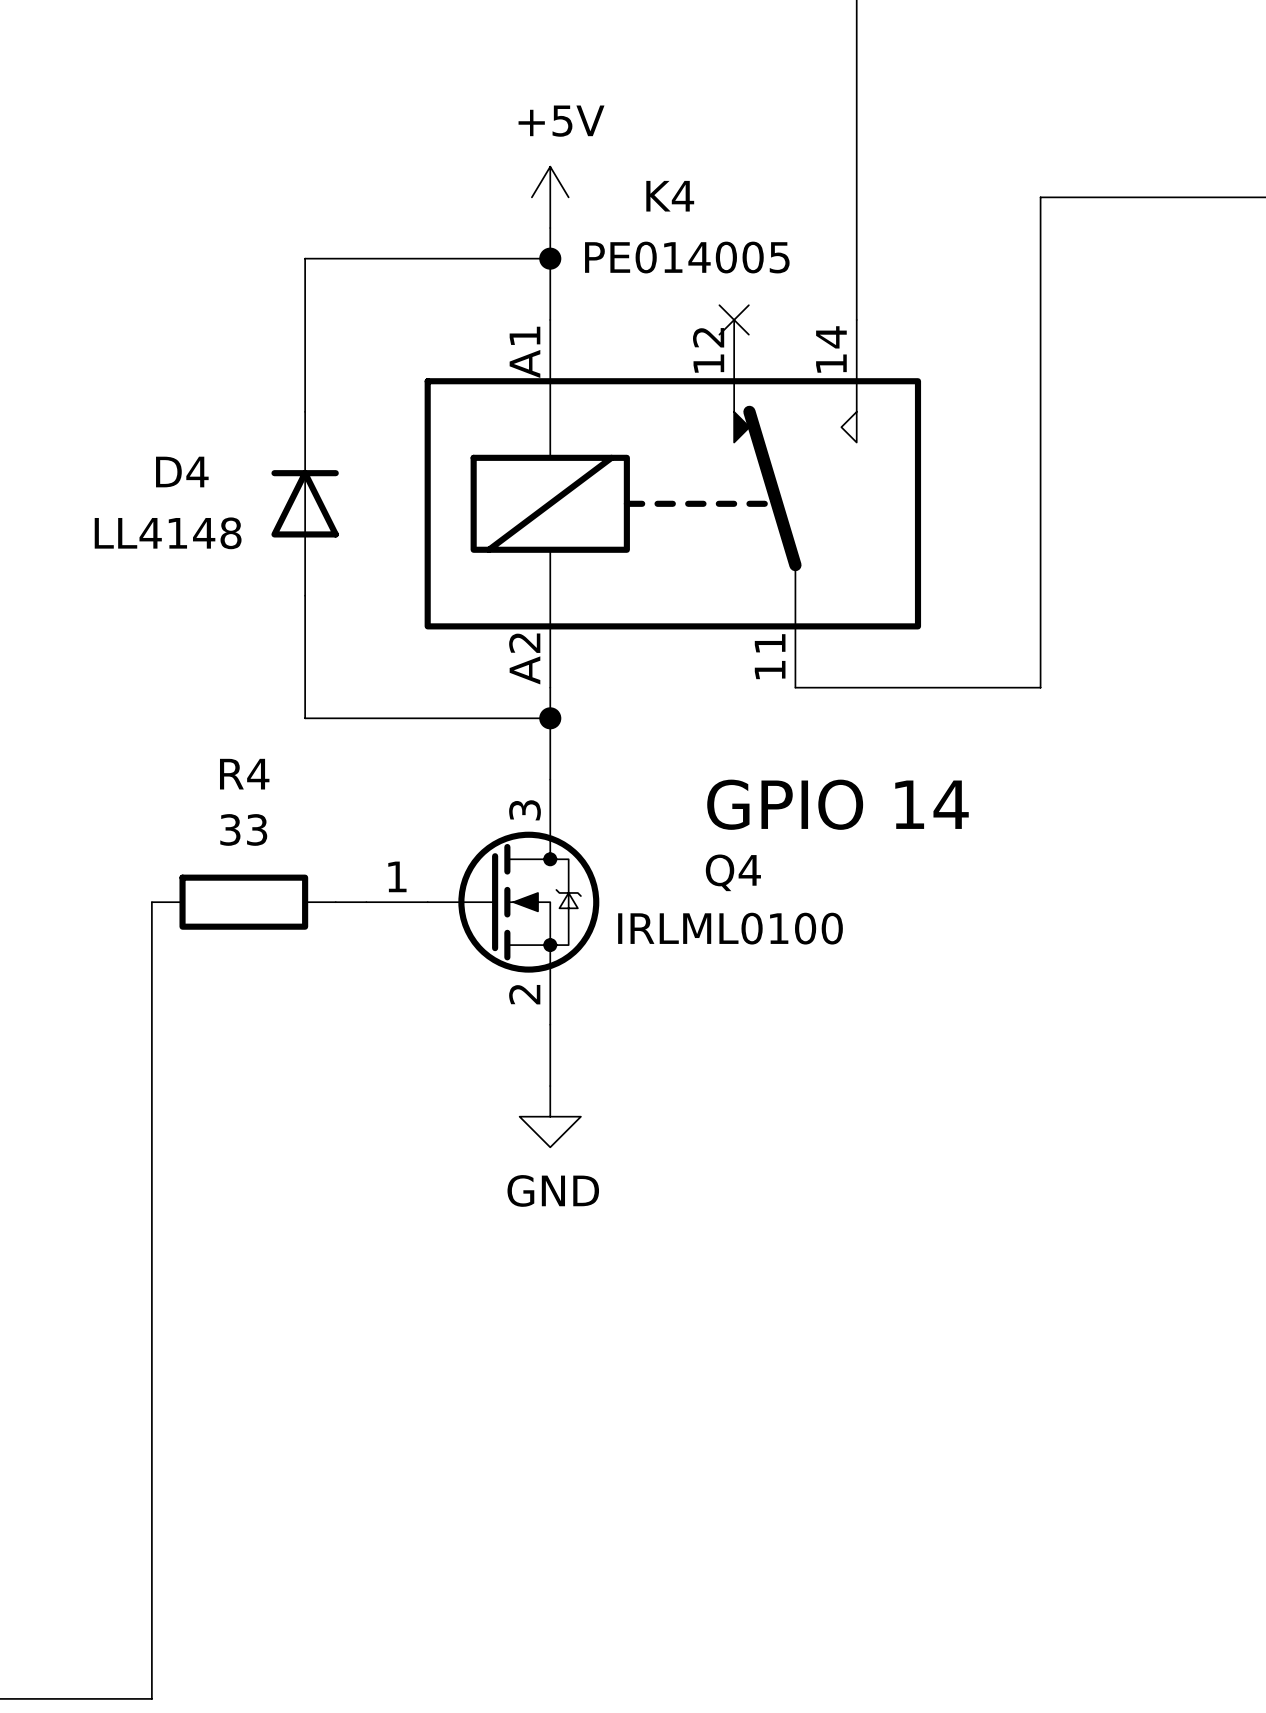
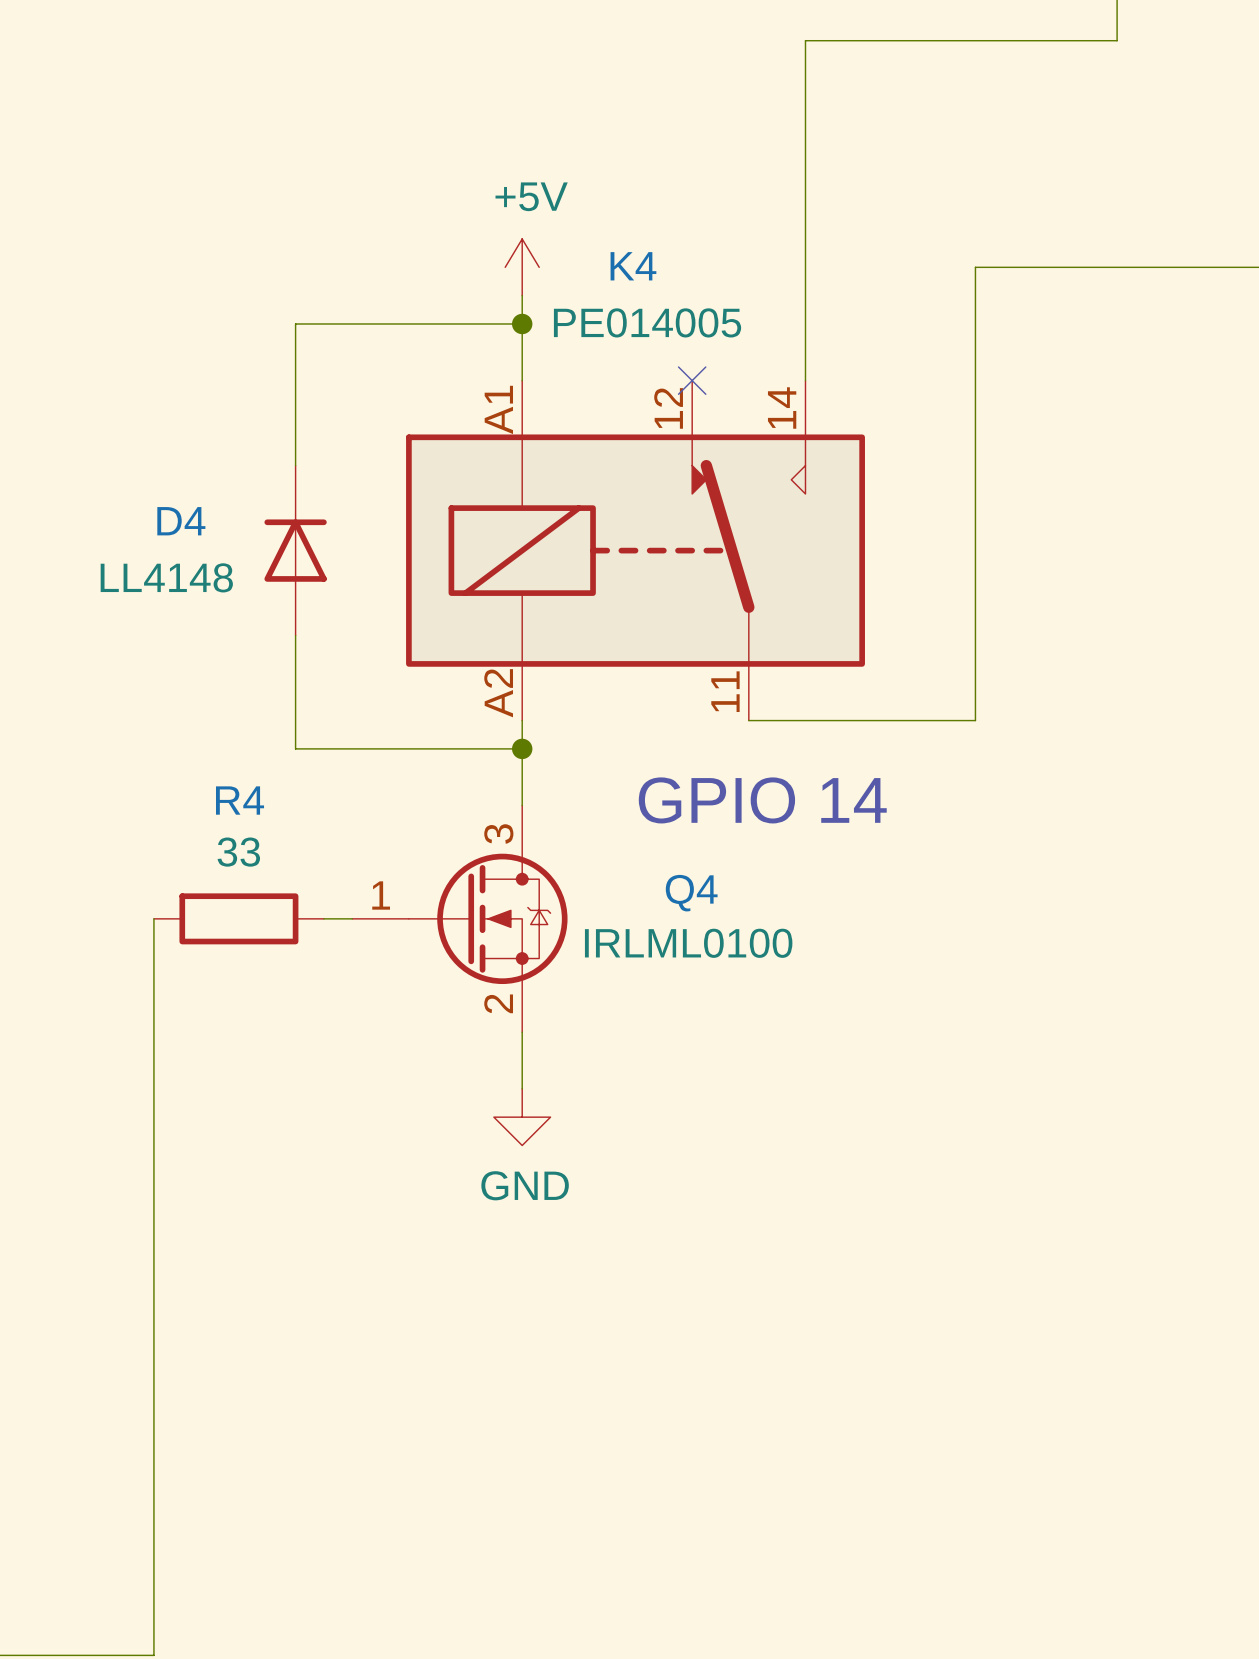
text position: GPIO 14 (837, 804) -> GPIO 14 (762, 800)

